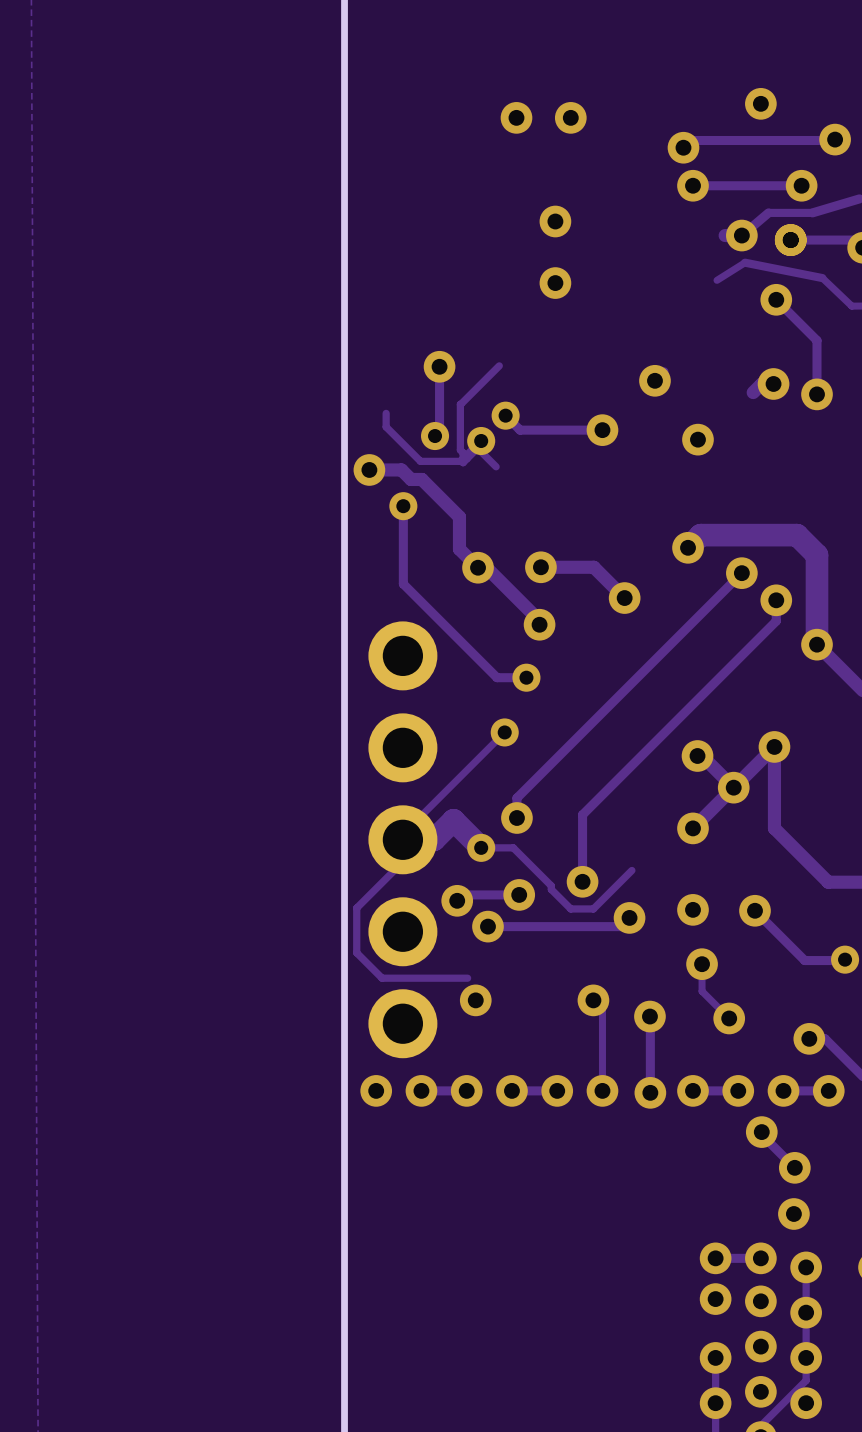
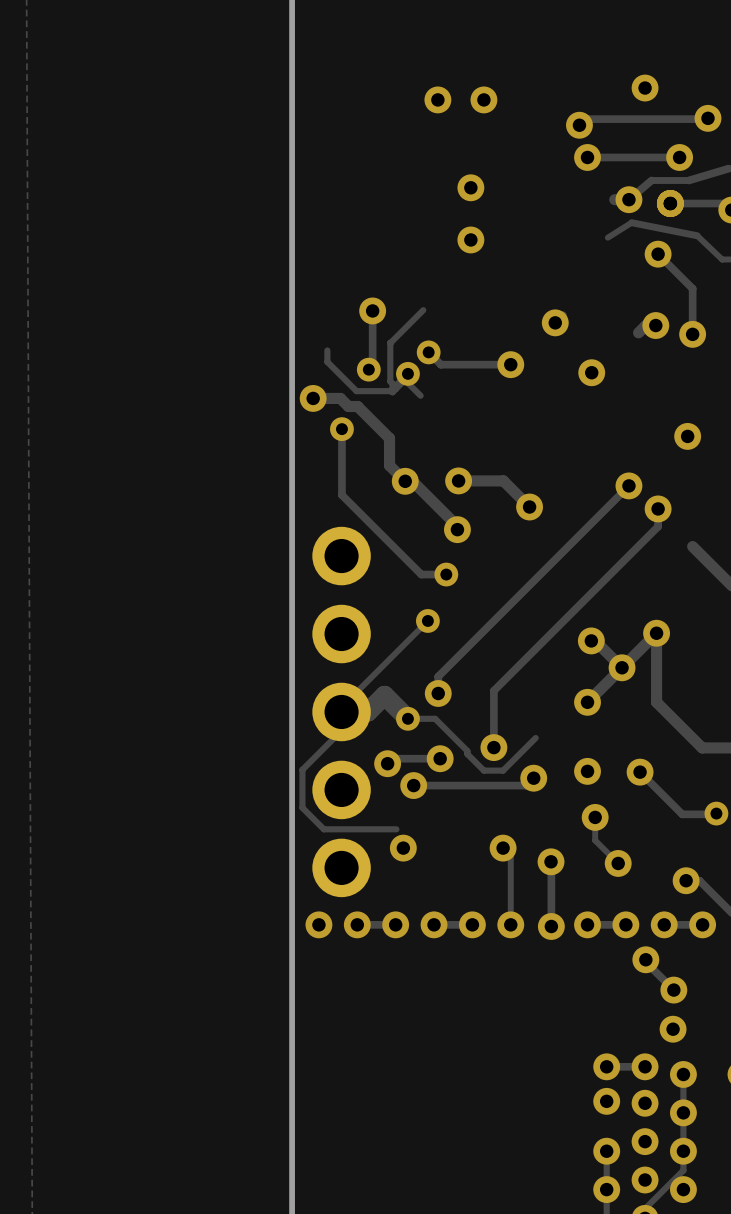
via: none -> (687, 436)
track: (688, 547) (700, 535) (797, 535) (817, 555) (817, 644) -> none
via: (688, 547) -> none
via: (817, 644) -> none

